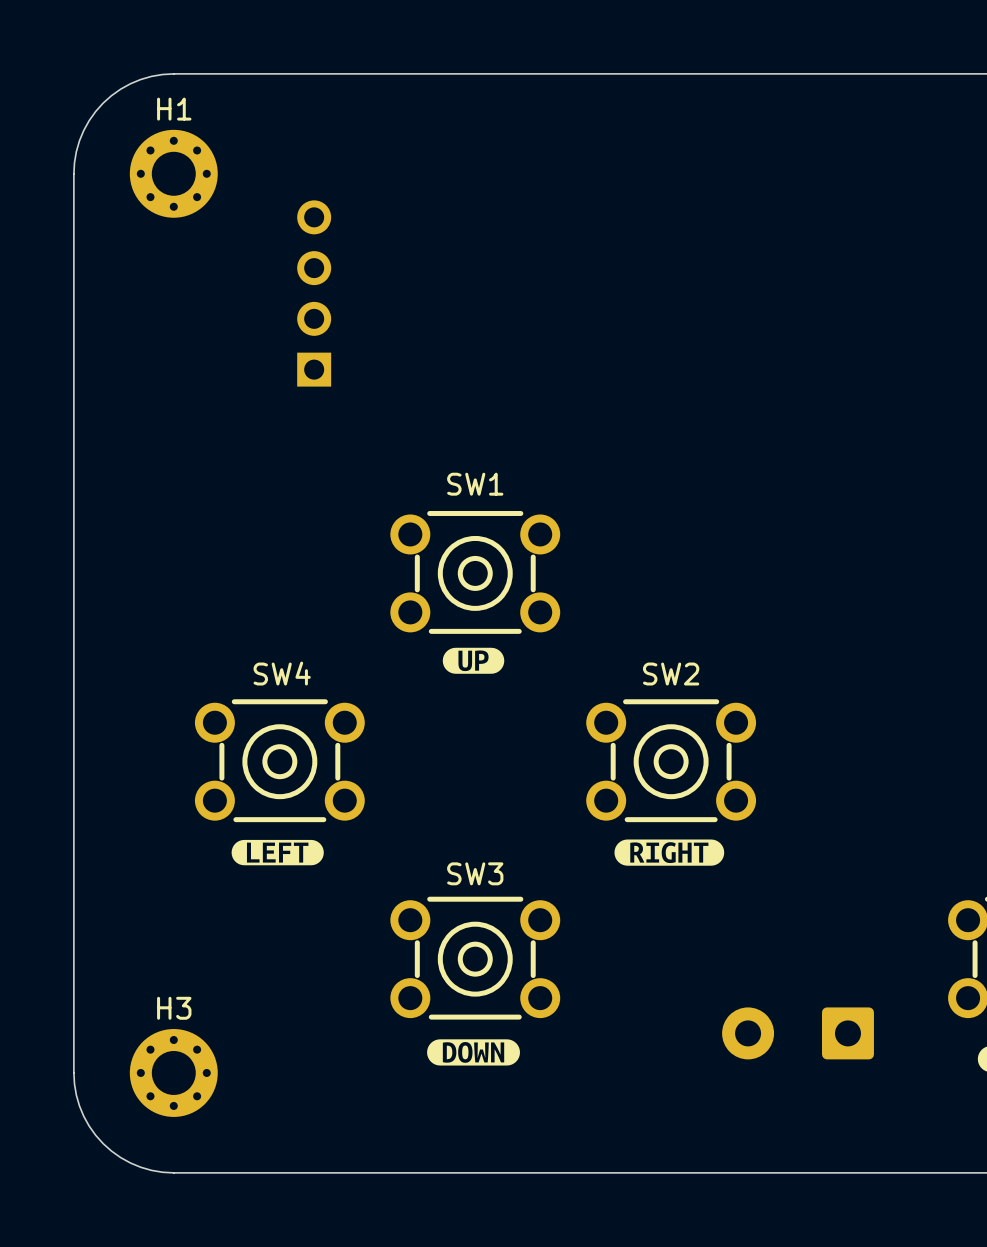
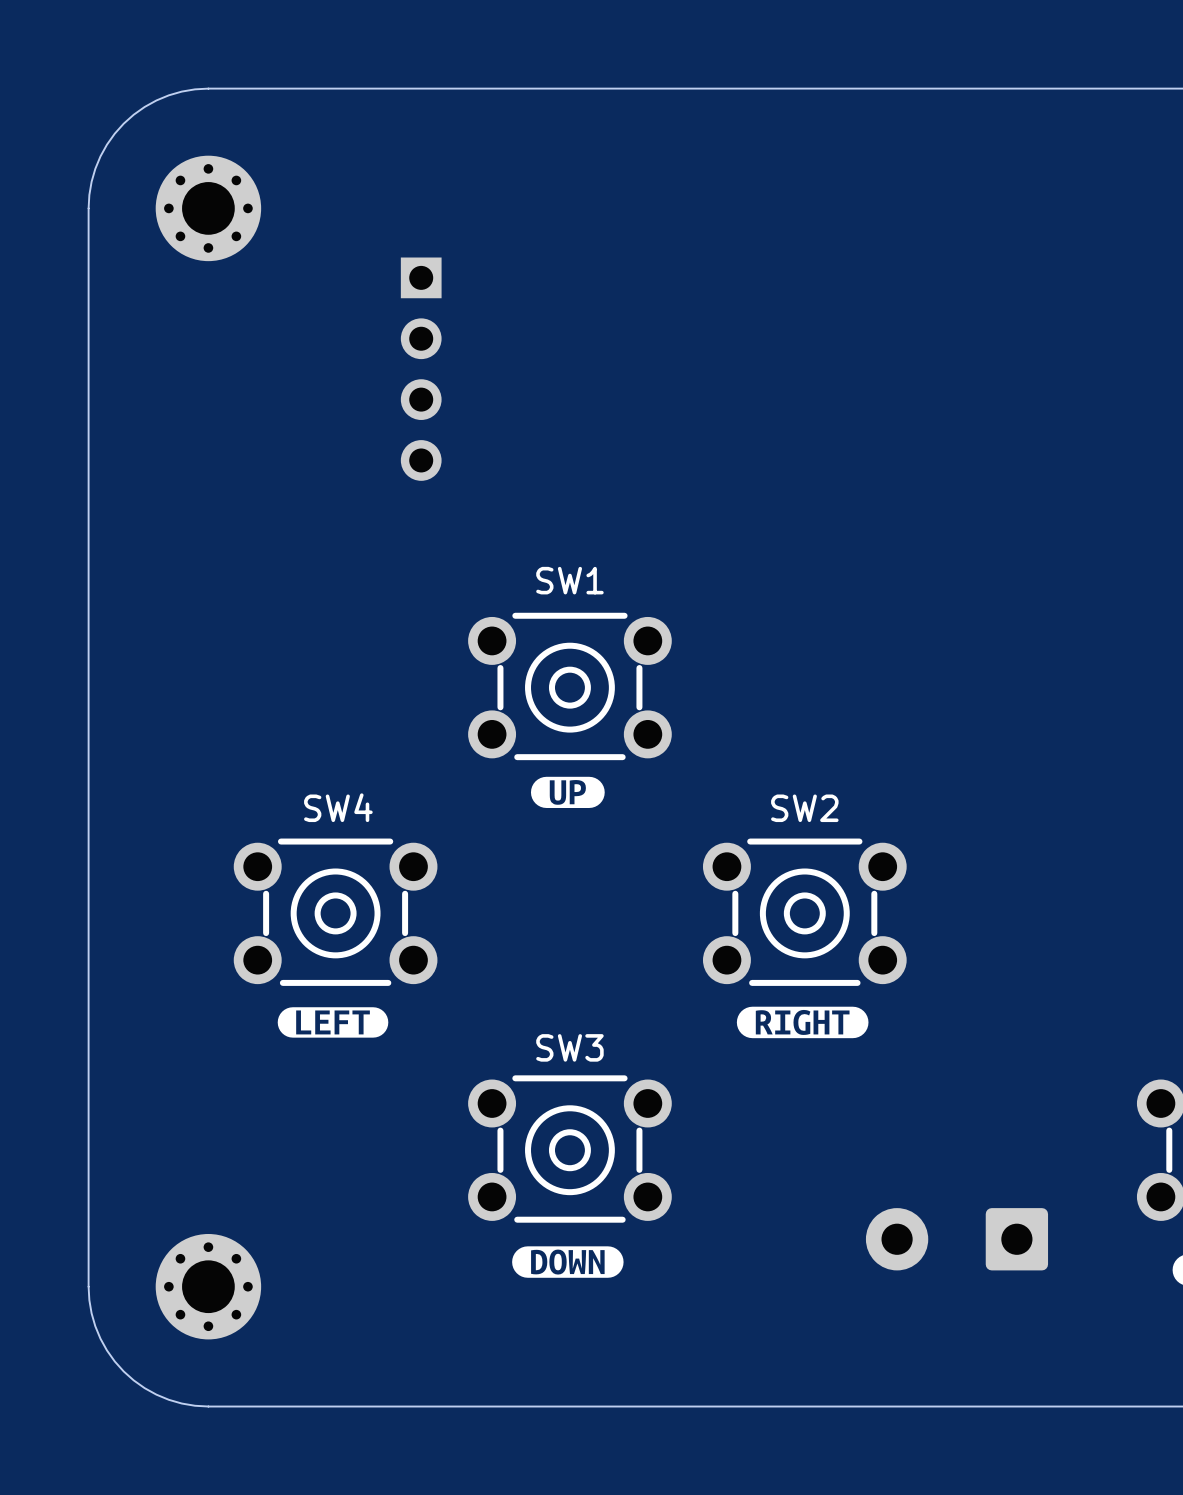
H1 name: H1 (174, 109) -> none
part rotation: 0° (314, 293) -> 180° (421, 369)
H3 name: H3 (174, 1008) -> none

